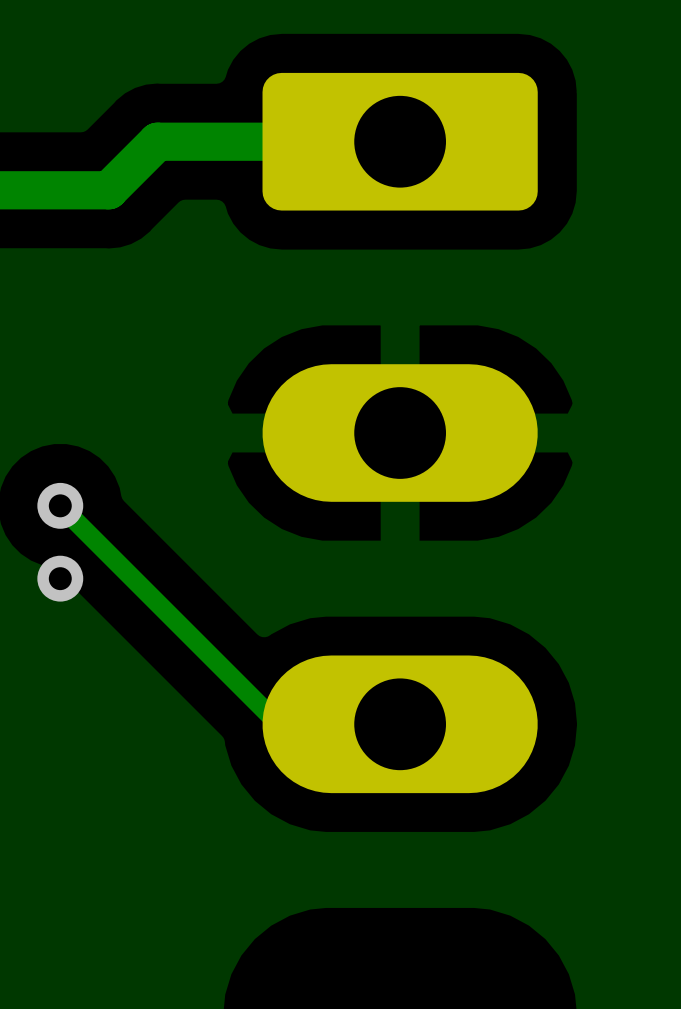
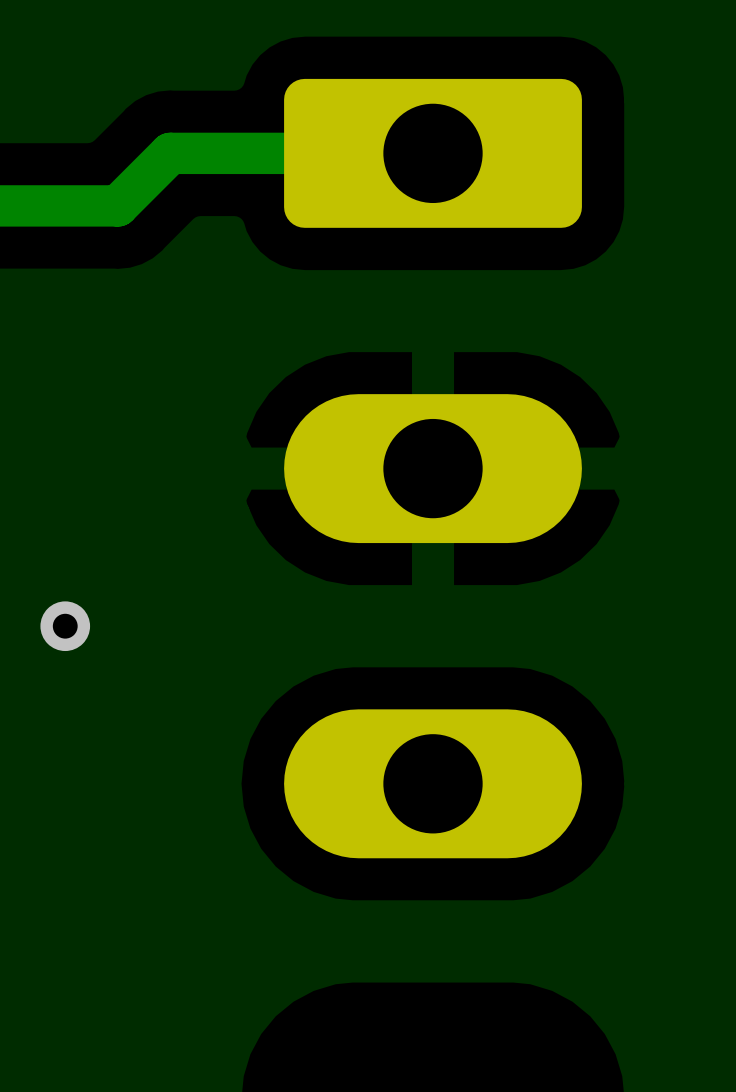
track: (60, 505) (278, 724) -> none
via: (60, 505) -> none

